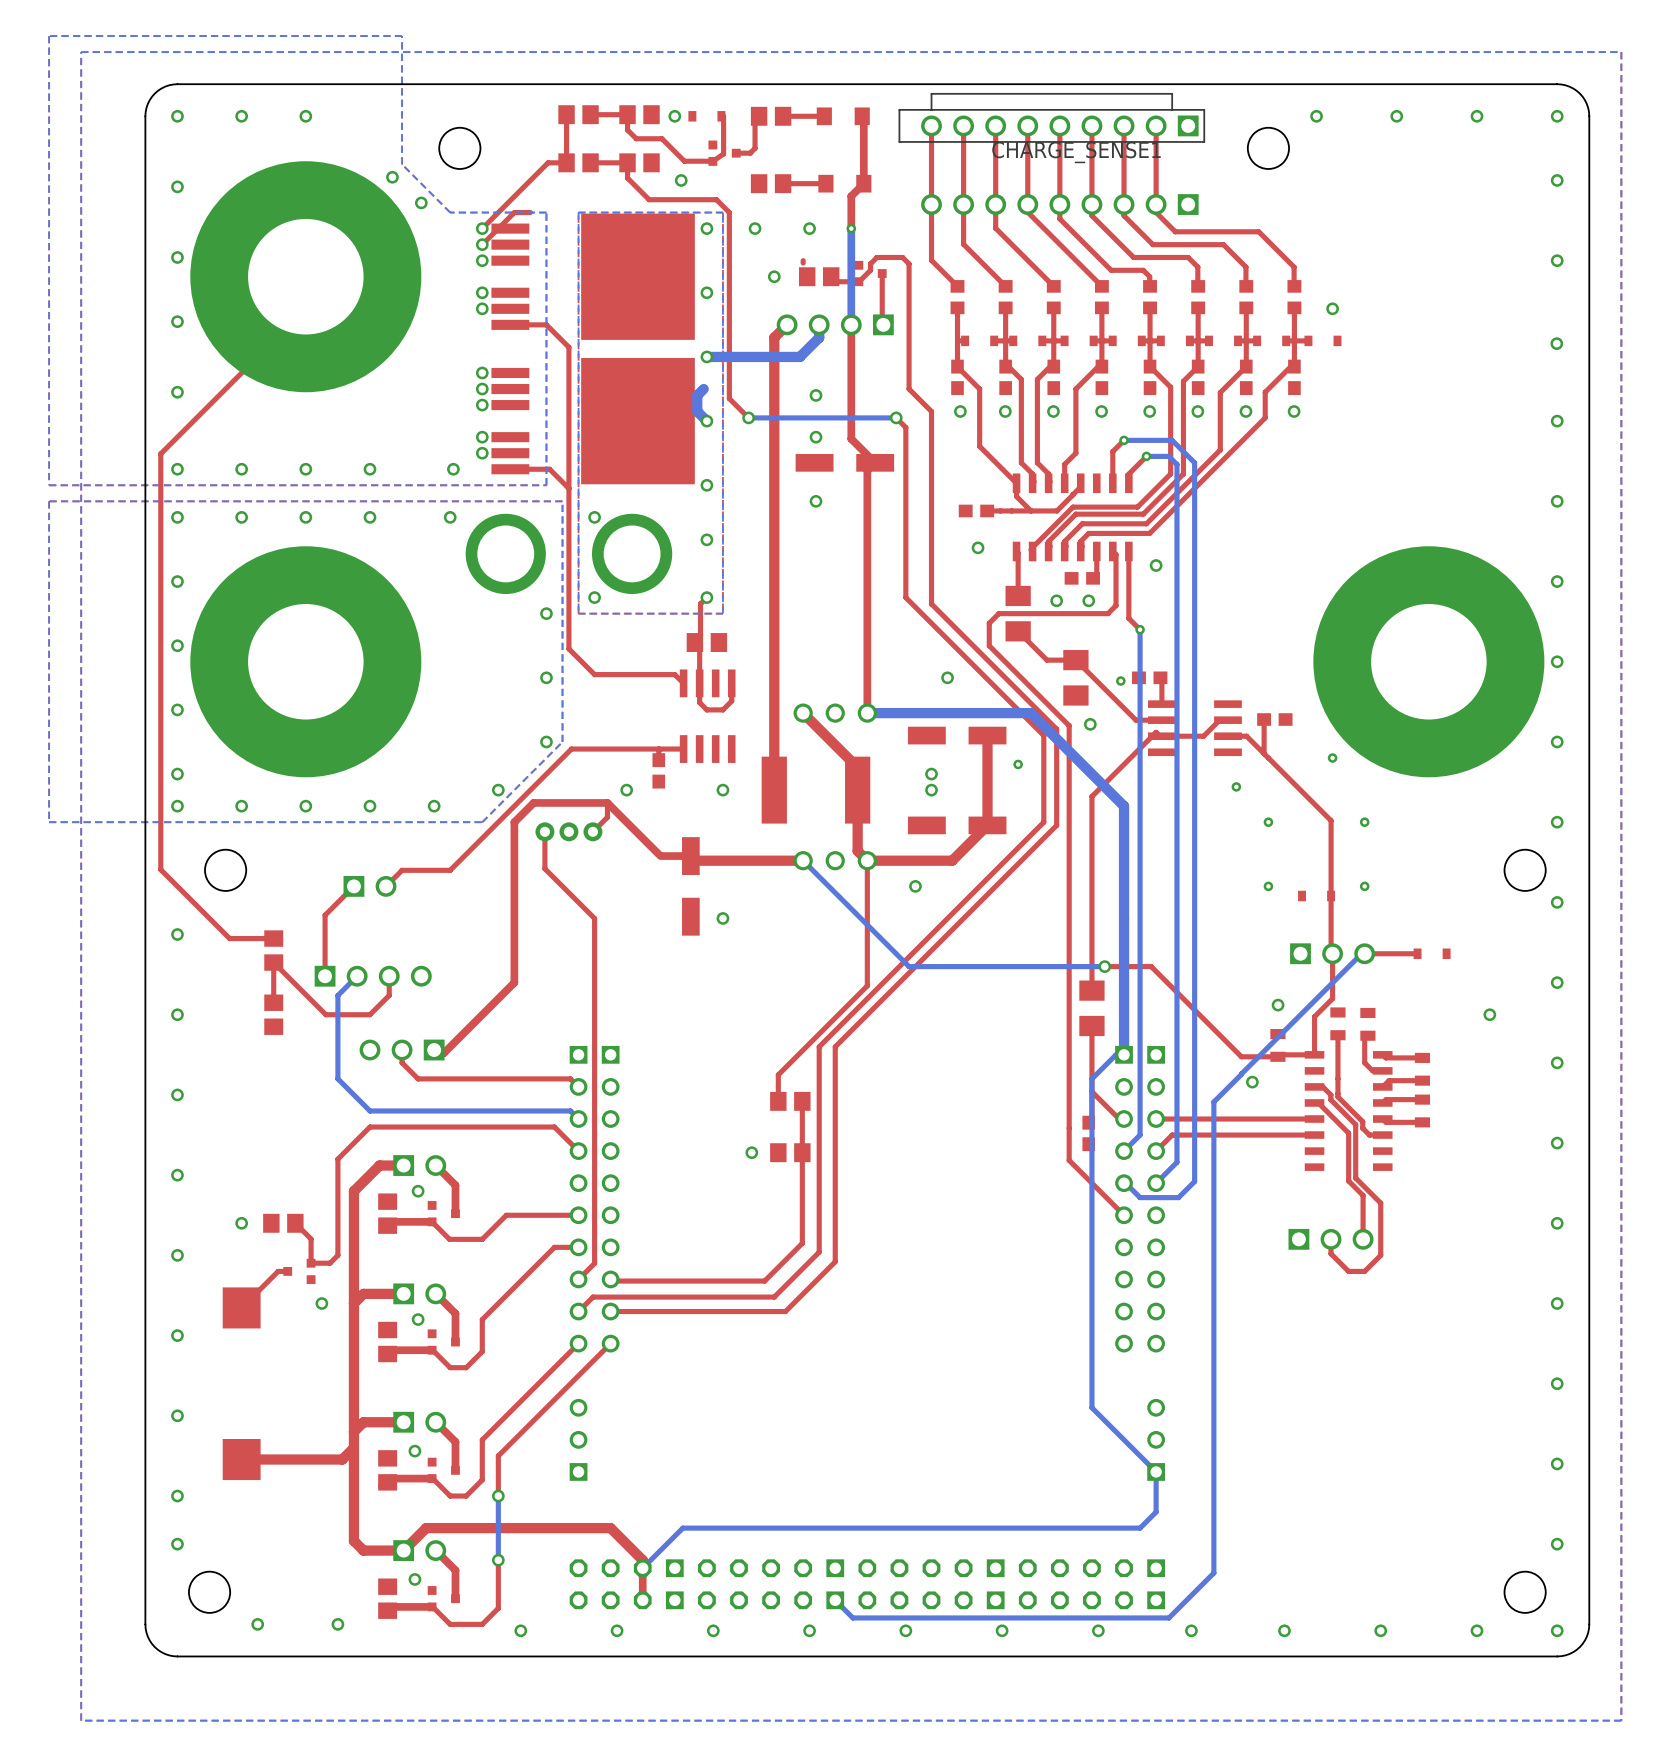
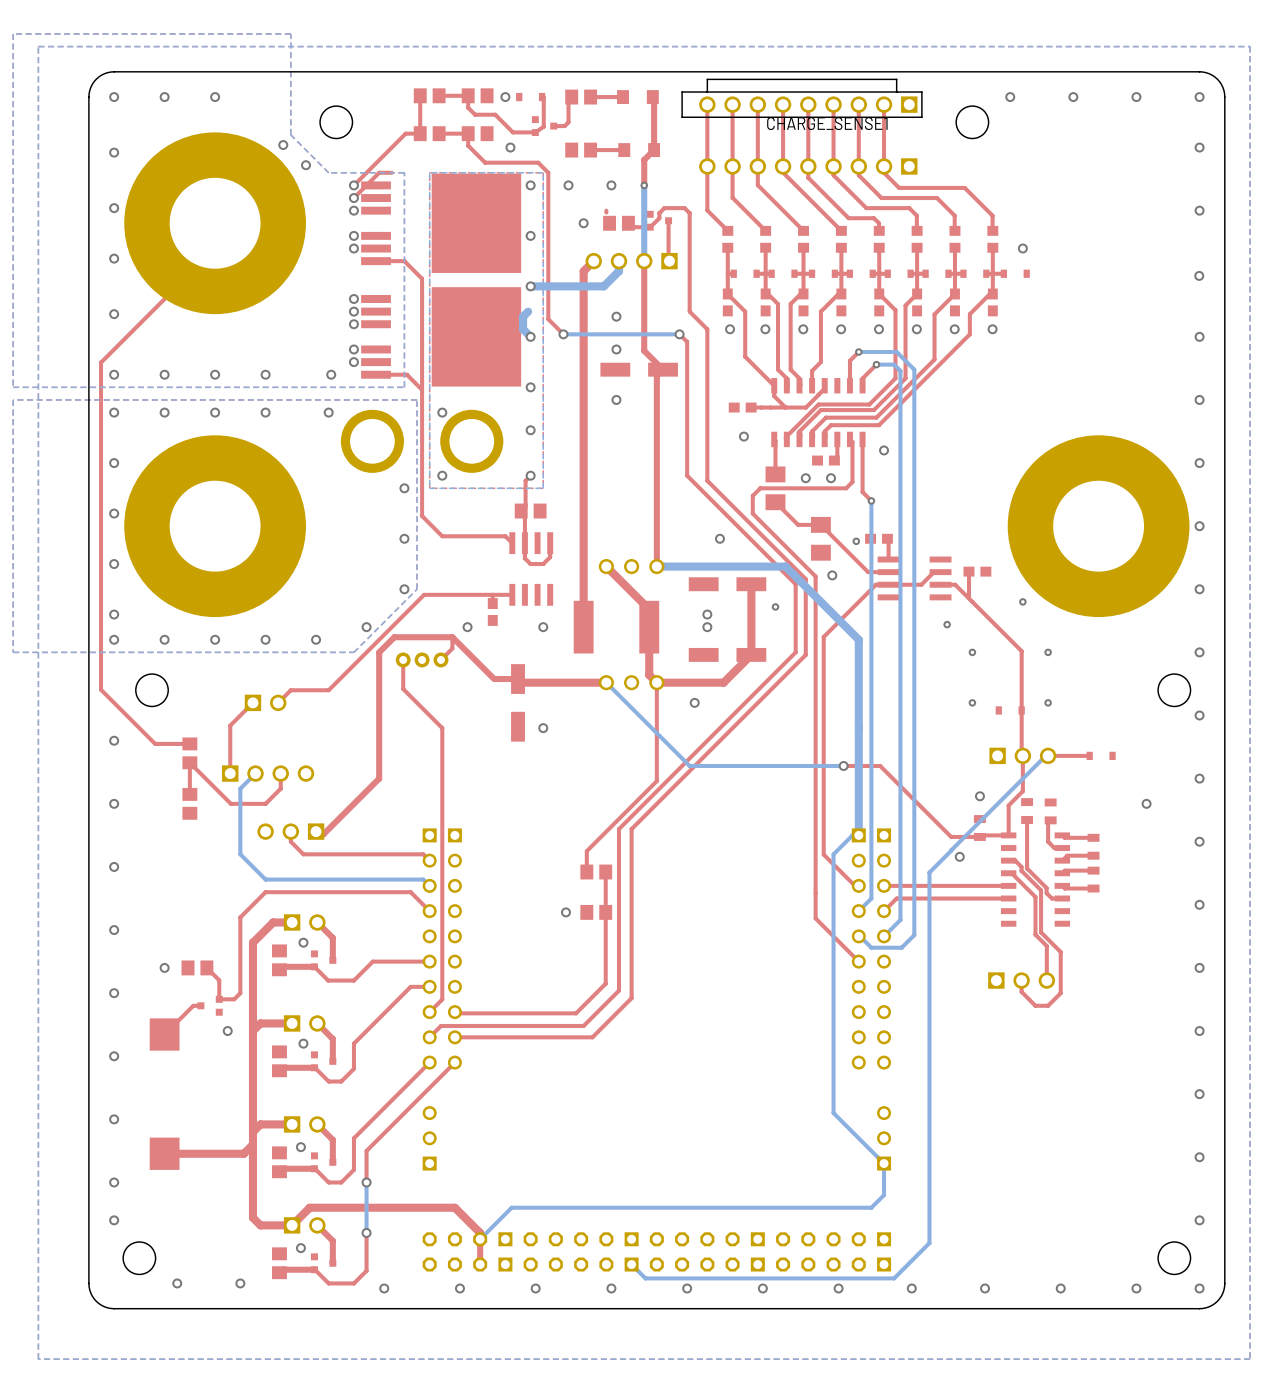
top track: (1159, 736) (1156, 732) (1091, 796) (1091, 990) -> (887, 584) (875, 584) (823, 636) (823, 854) (833, 864)
part: (1091, 1008) -> none
top track: (1091, 1025) (1091, 1119) (1088, 1122) -> none
part: (1088, 1133) -> none

